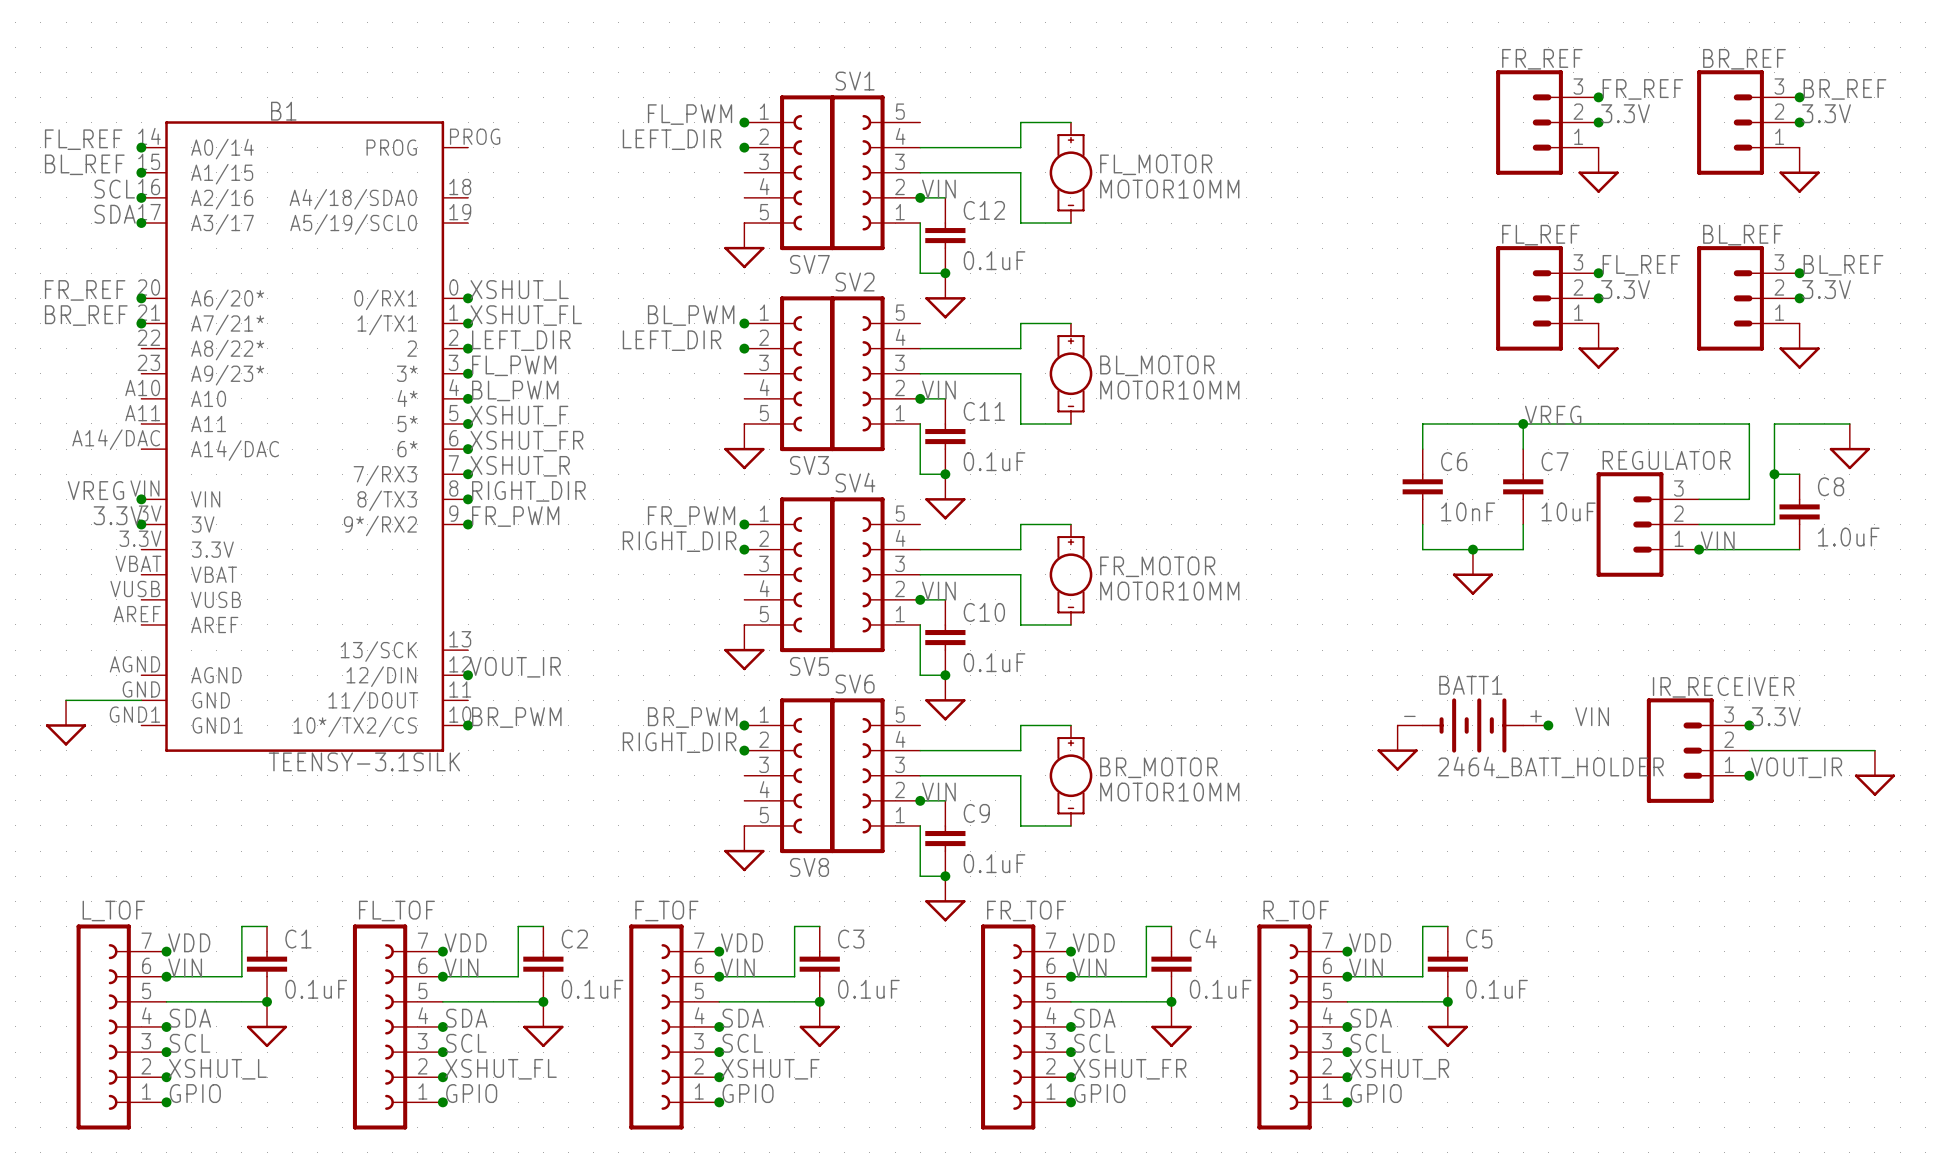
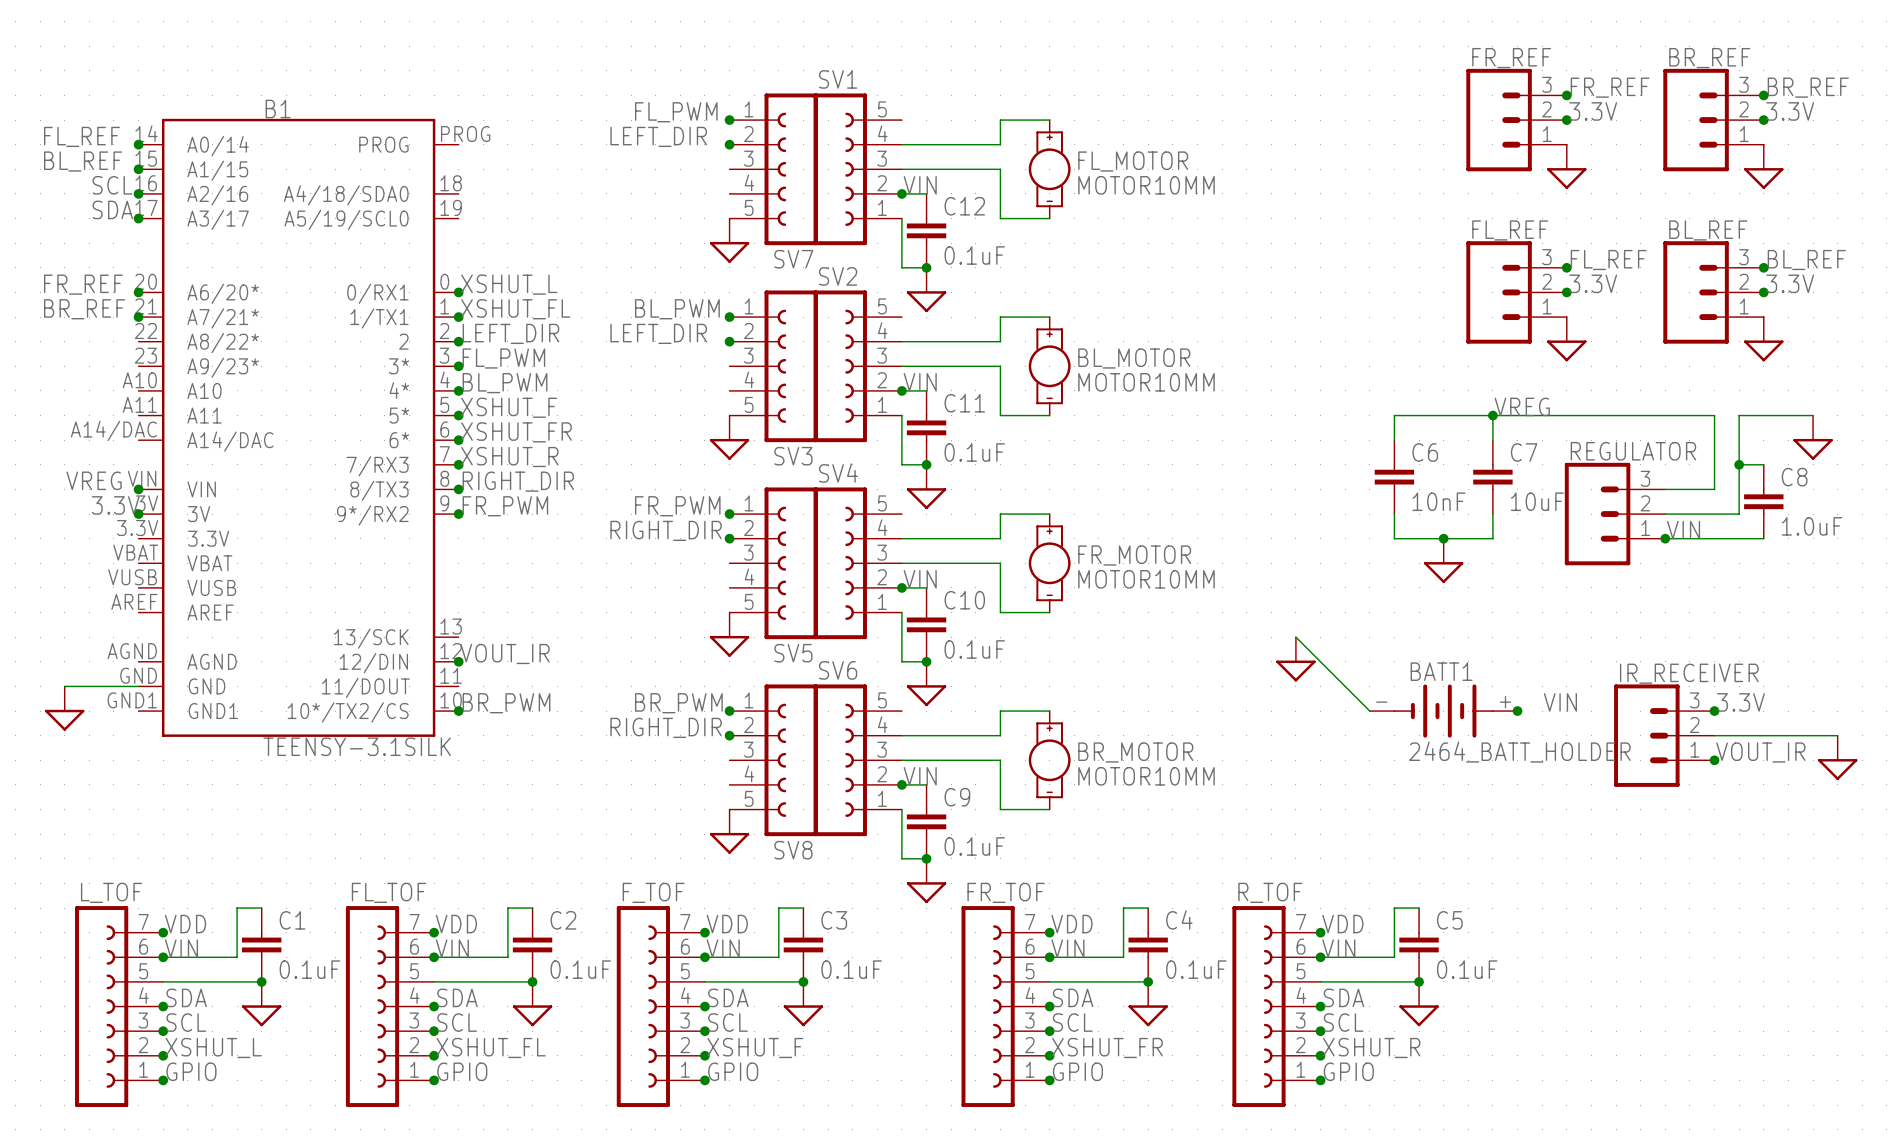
wire: none -> (1295, 637) (1369, 711)
power symbol position: (1397, 748) -> (1295, 659)

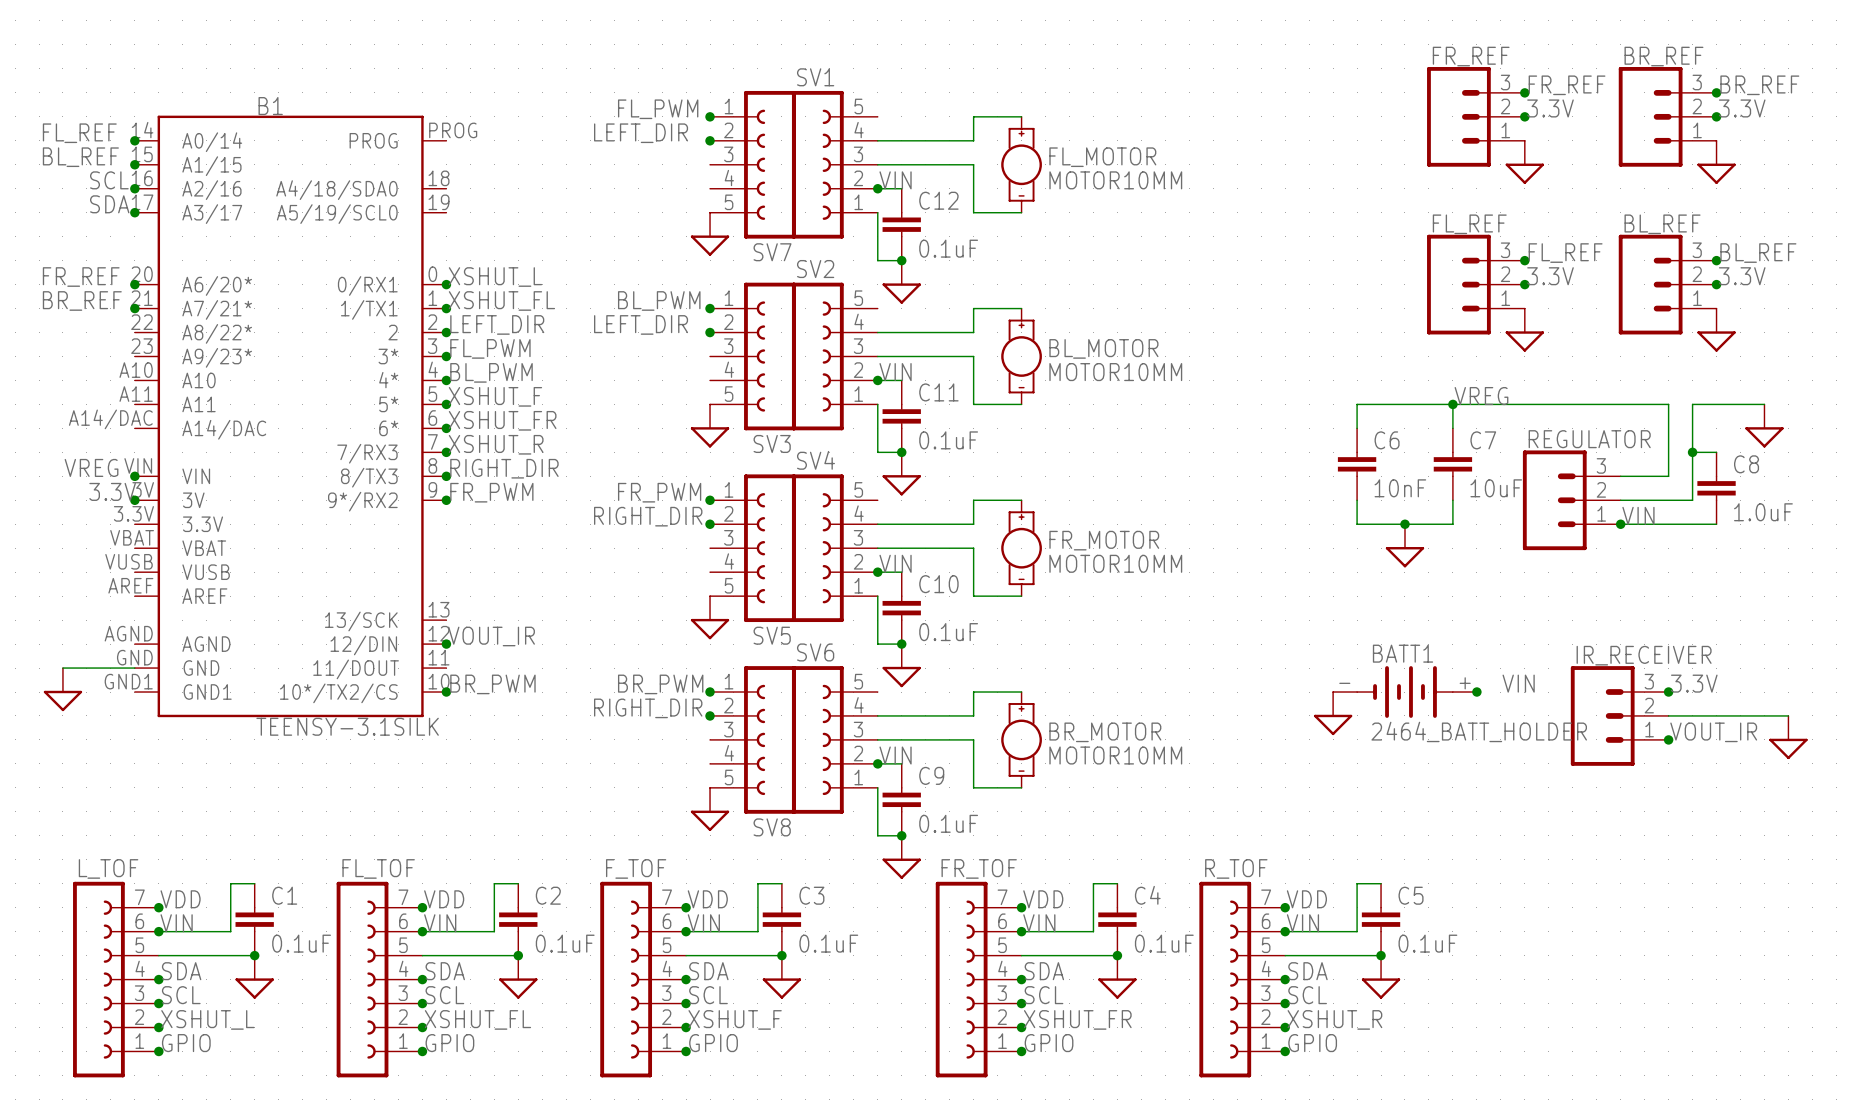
wire: (1295, 637) (1369, 711) -> none
power symbol position: (1295, 659) -> (1333, 713)

